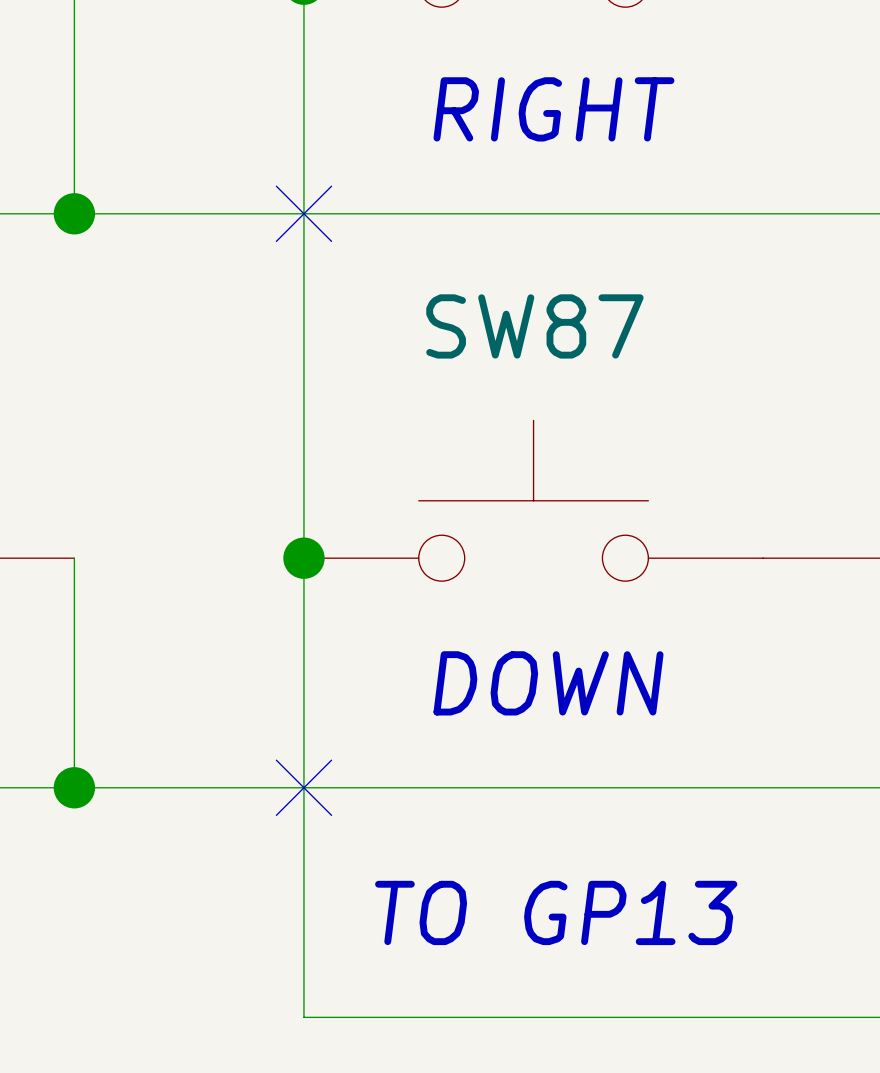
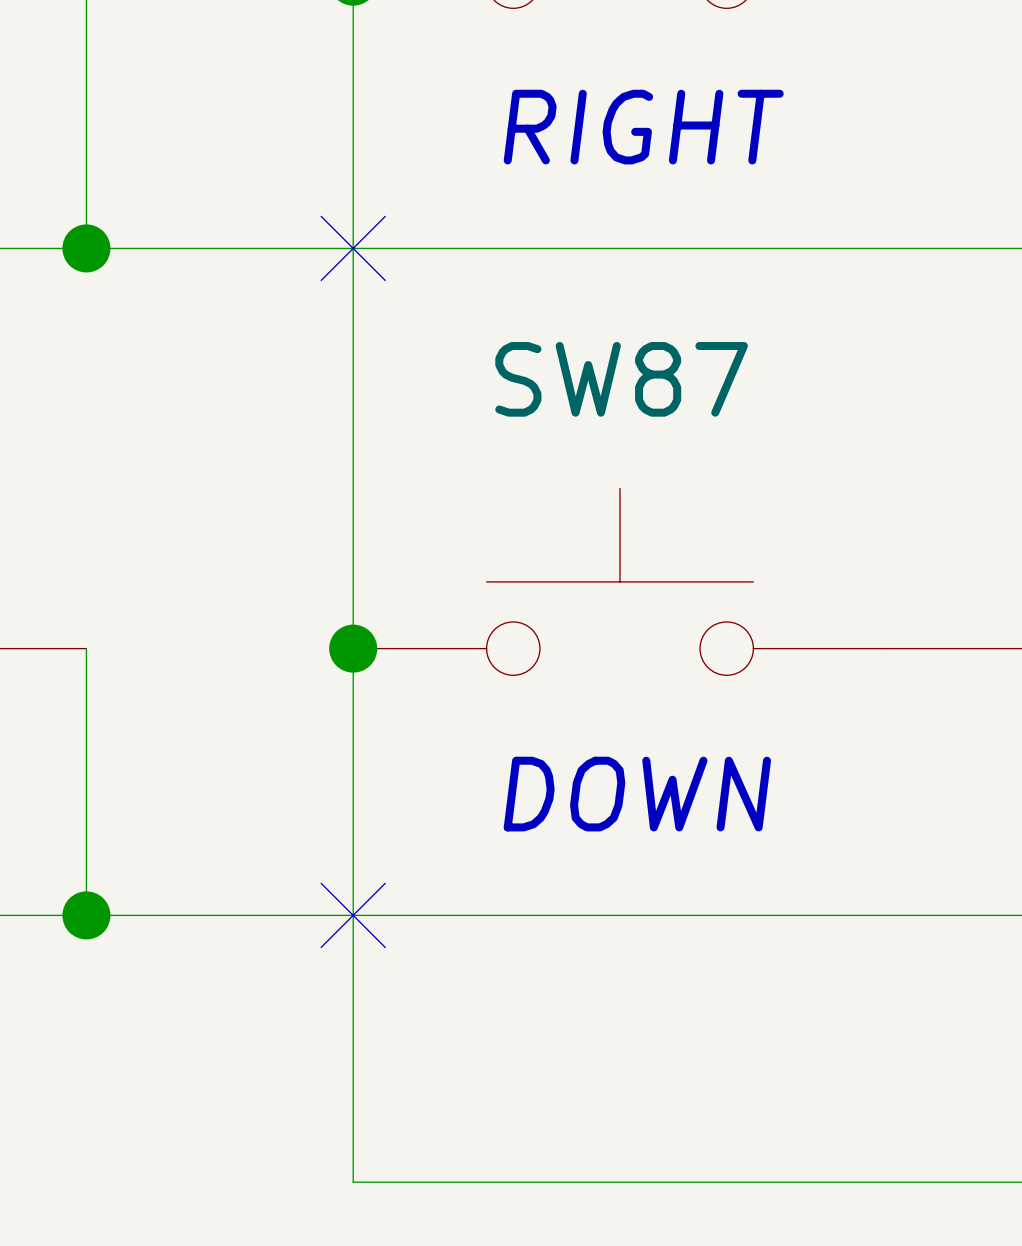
text: TO GP13 (556, 912) -> none

